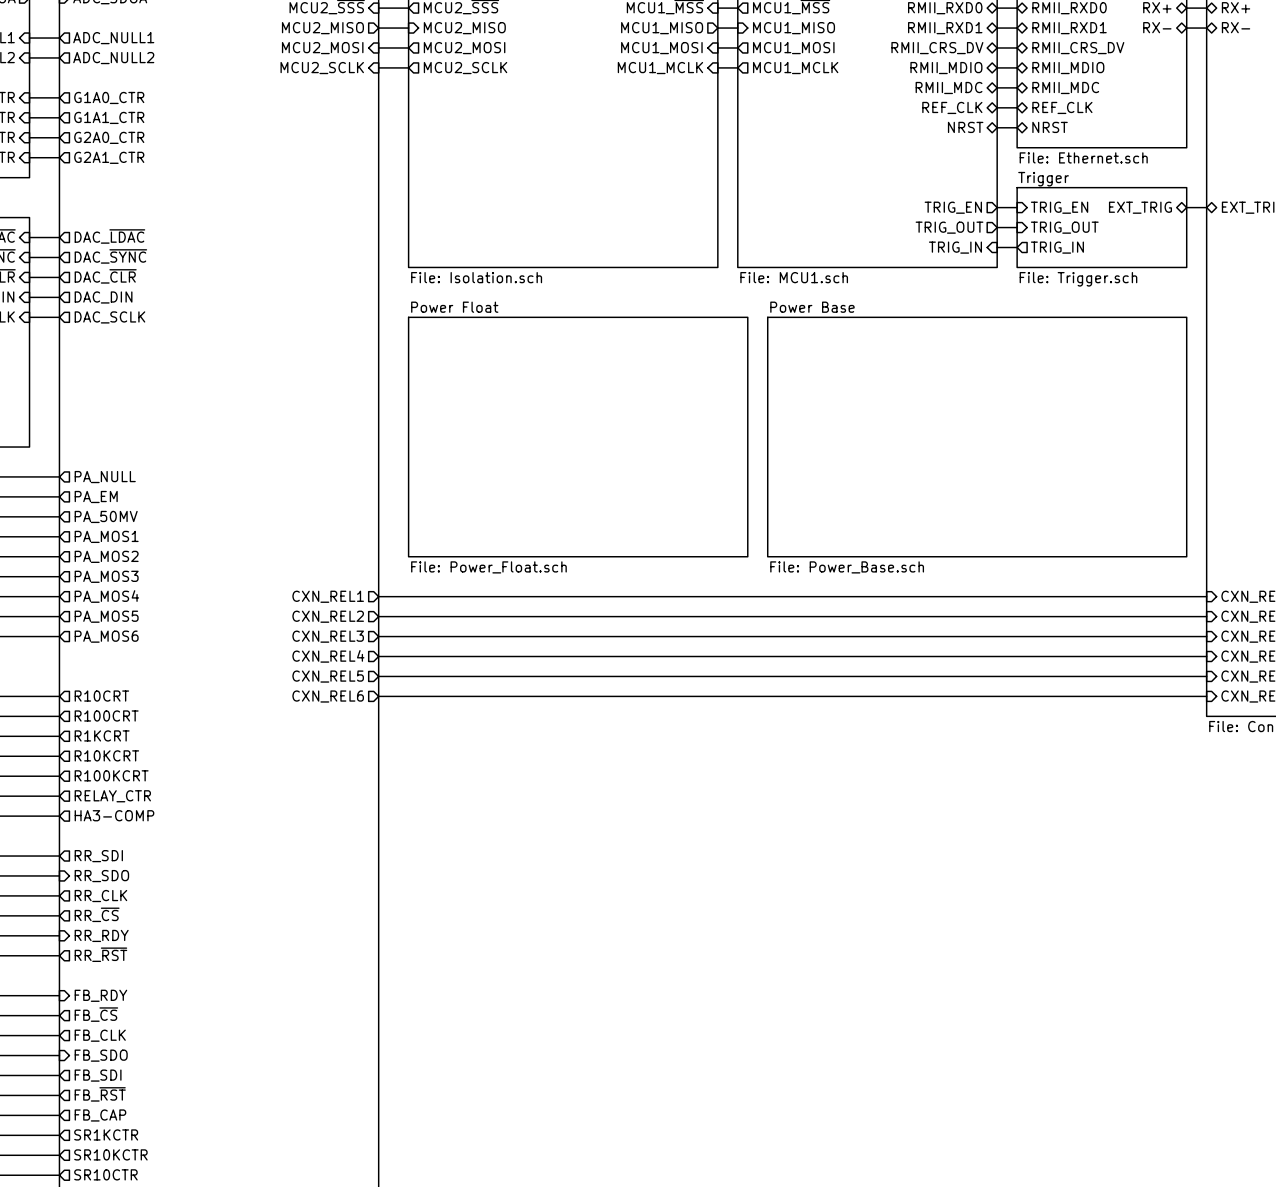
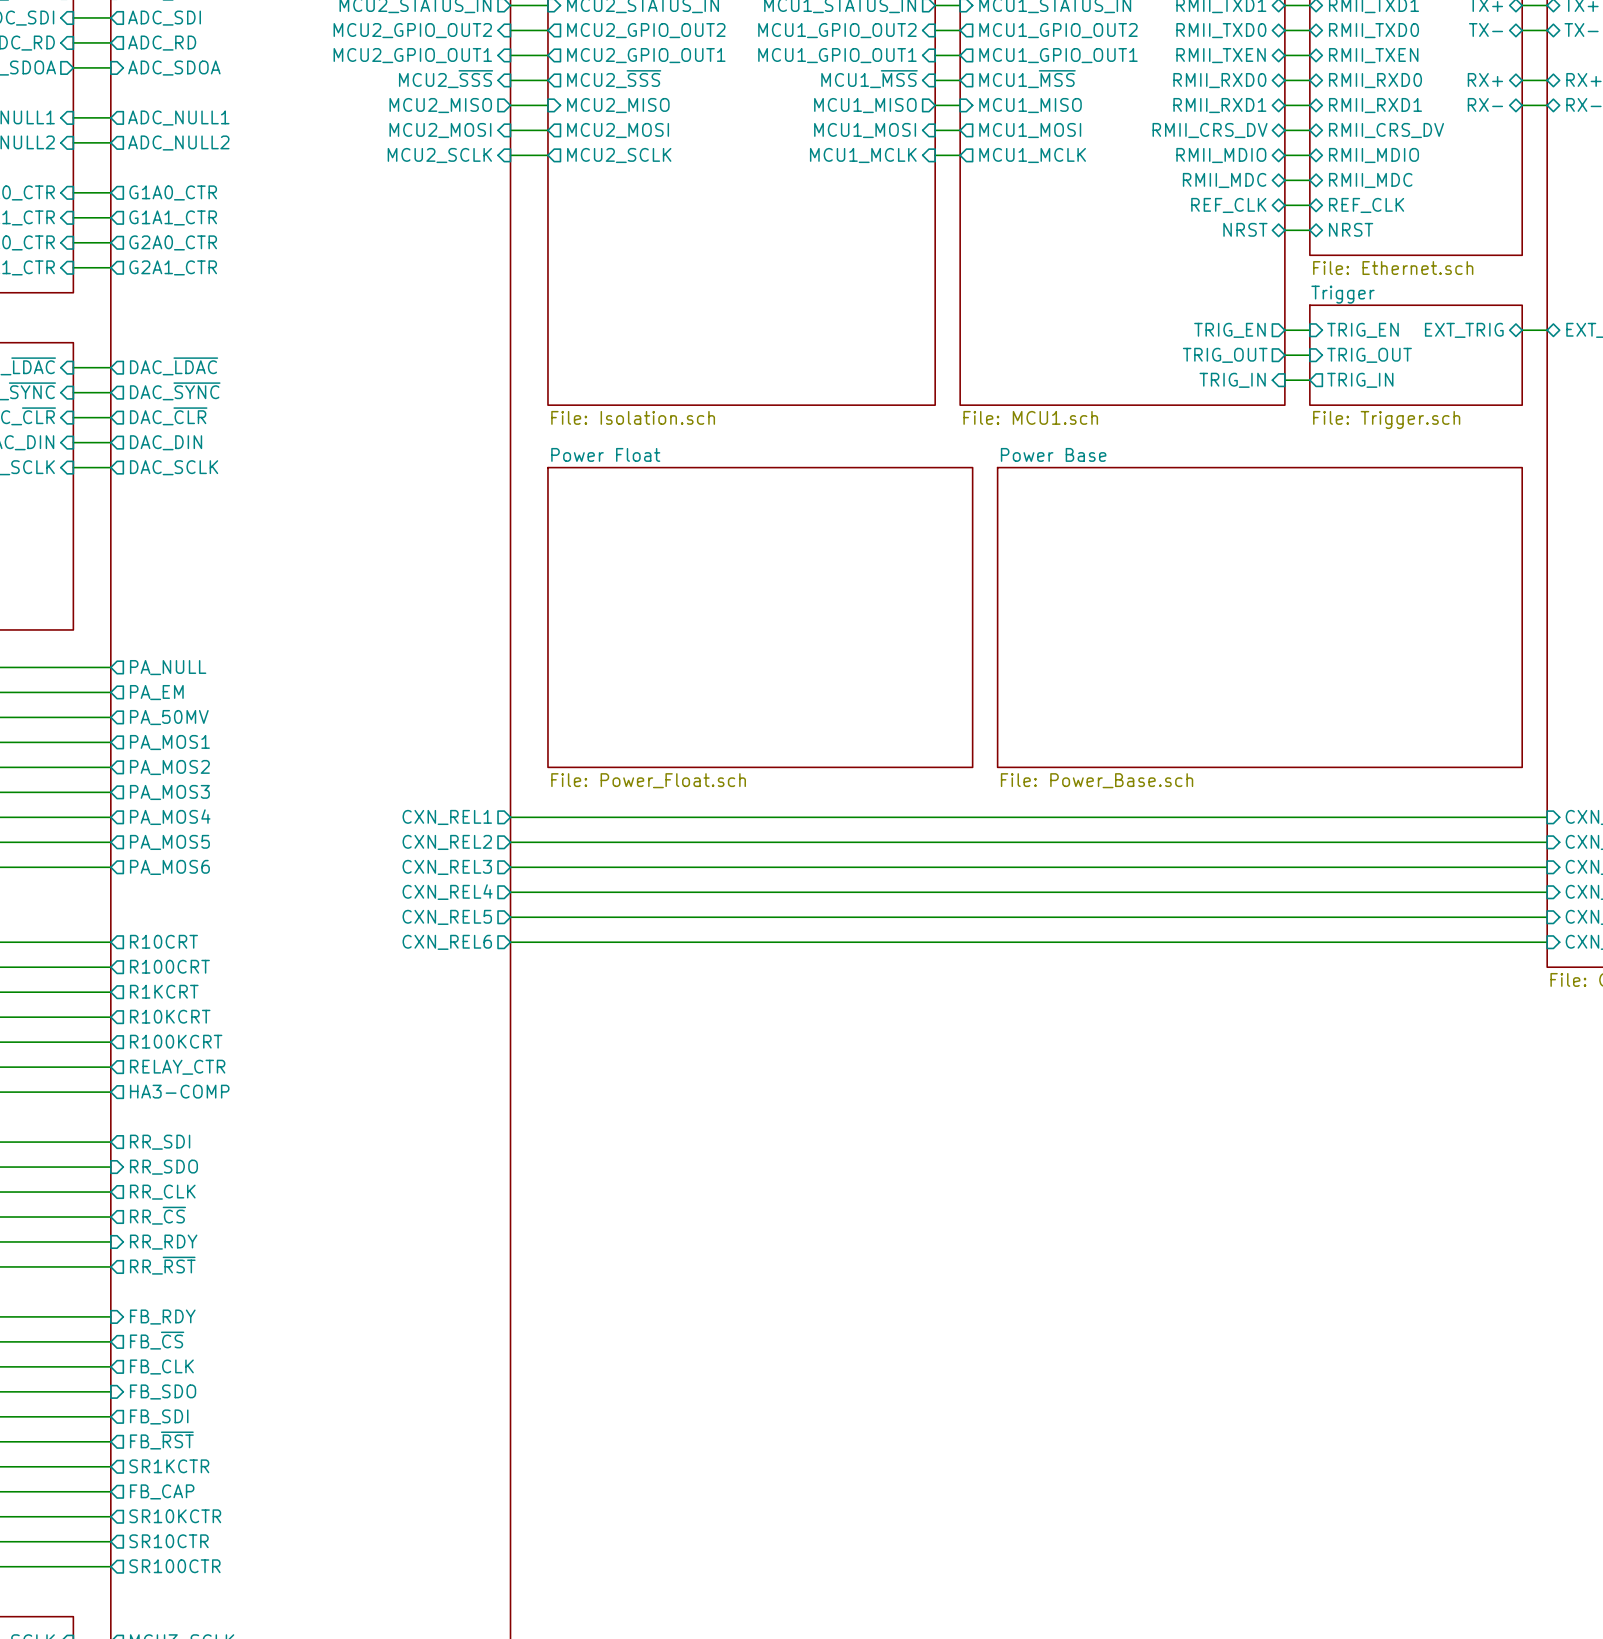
sheet pin: FB_CAP (100, 1115) -> SR1KCTR (169, 1466)
sheet pin: SR1KCTR (106, 1134) -> FB_CAP (162, 1491)

